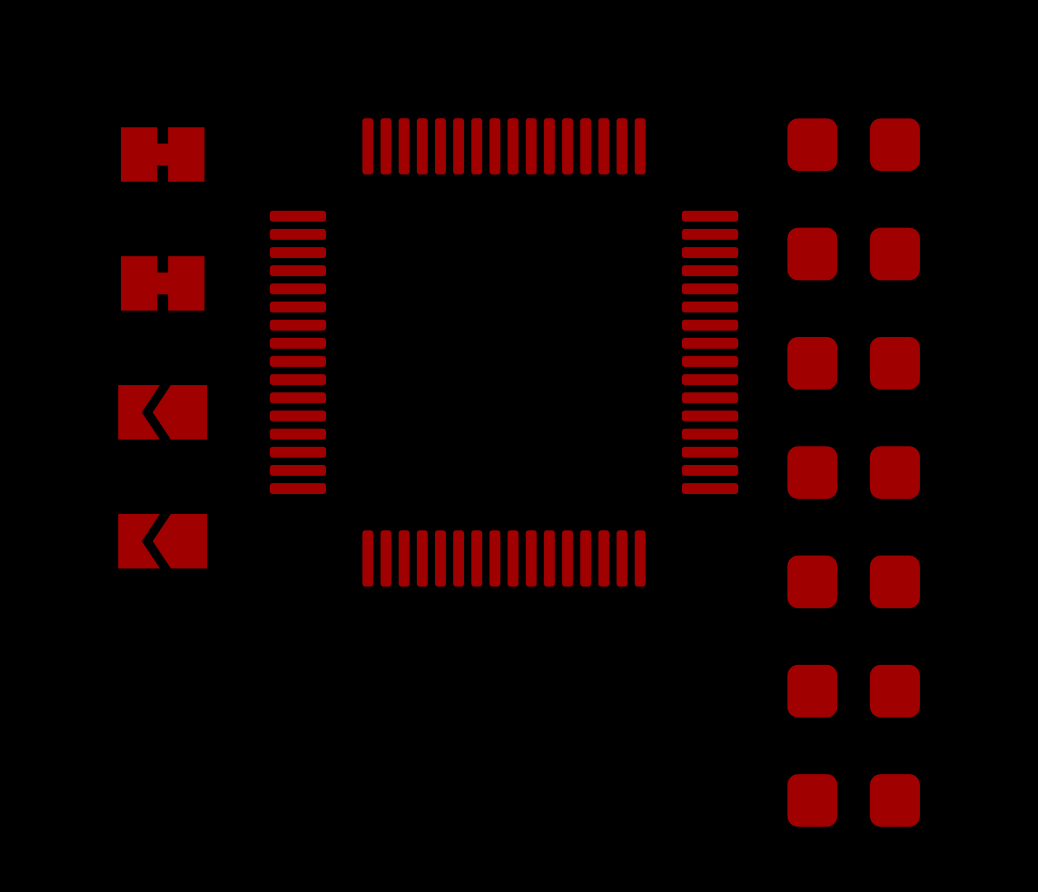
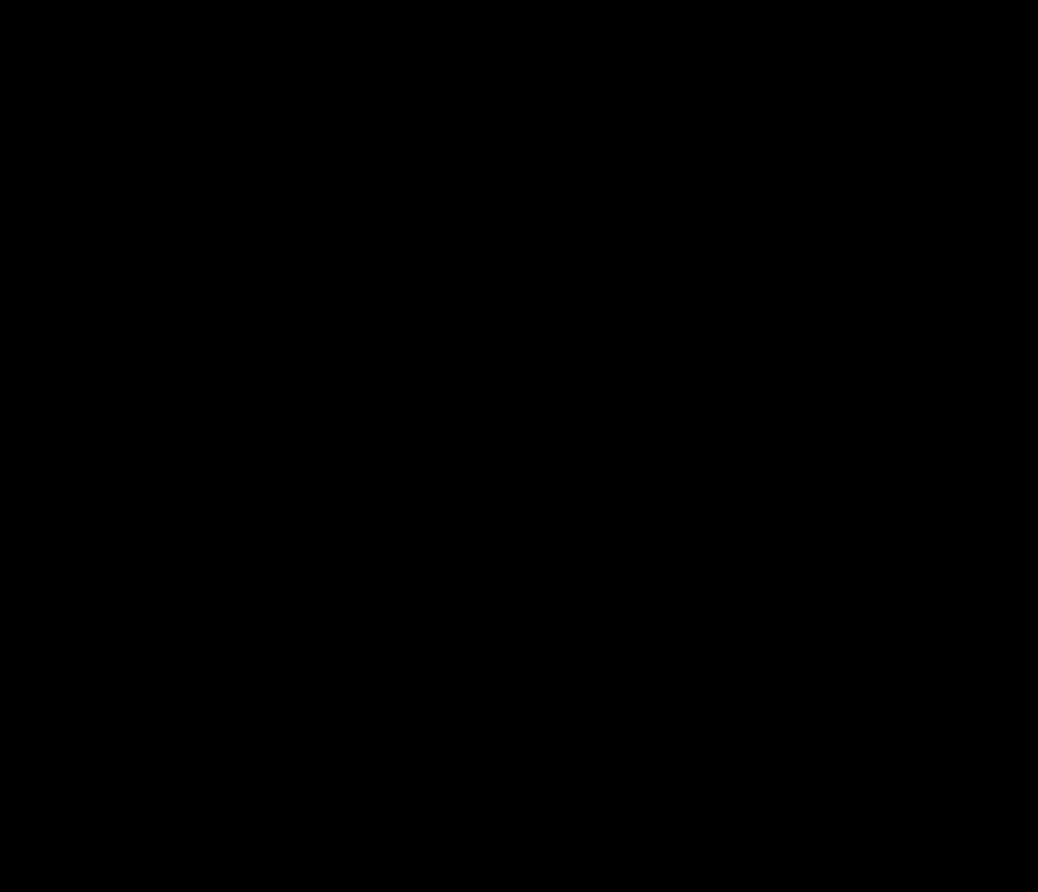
part: (853, 144) -> none
part: (162, 154) -> none
part: (853, 253) -> none
part: (162, 283) -> none
part: (503, 352) -> none
part: (853, 363) -> none
part: (162, 412) -> none
part: (853, 472) -> none
part: (162, 541) -> none
part: (853, 581) -> none
part: (853, 691) -> none
part: (853, 800) -> none

